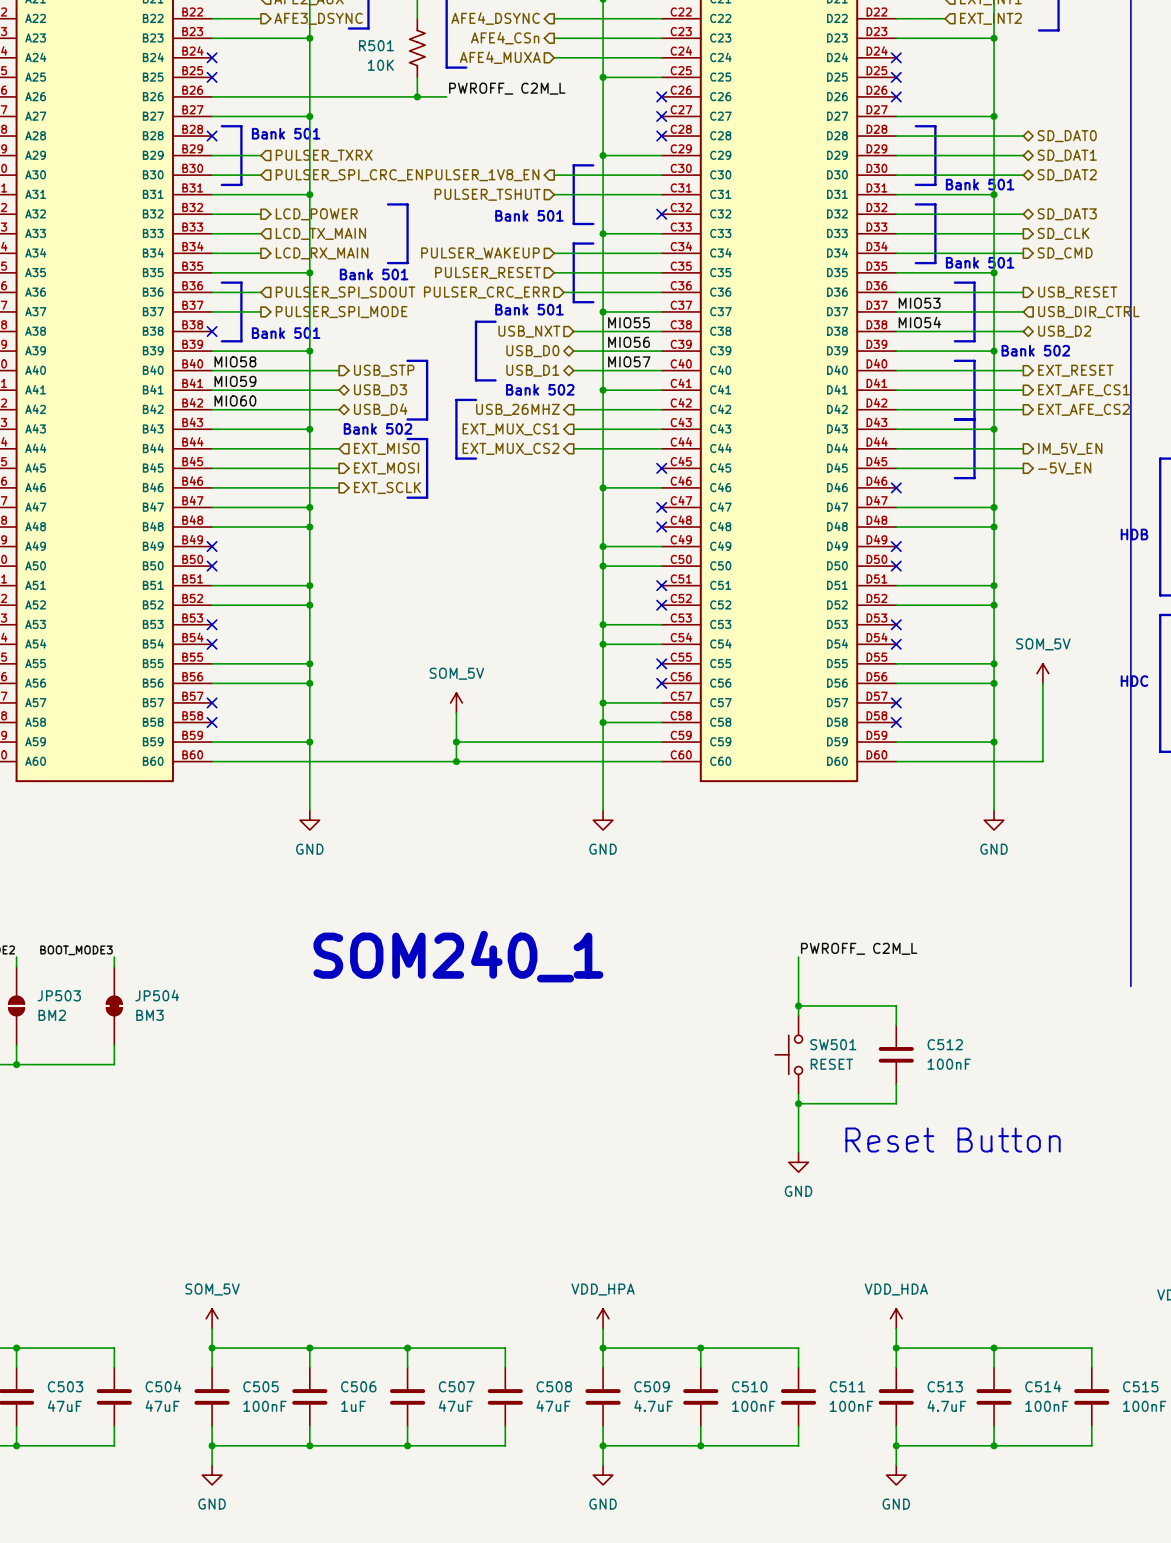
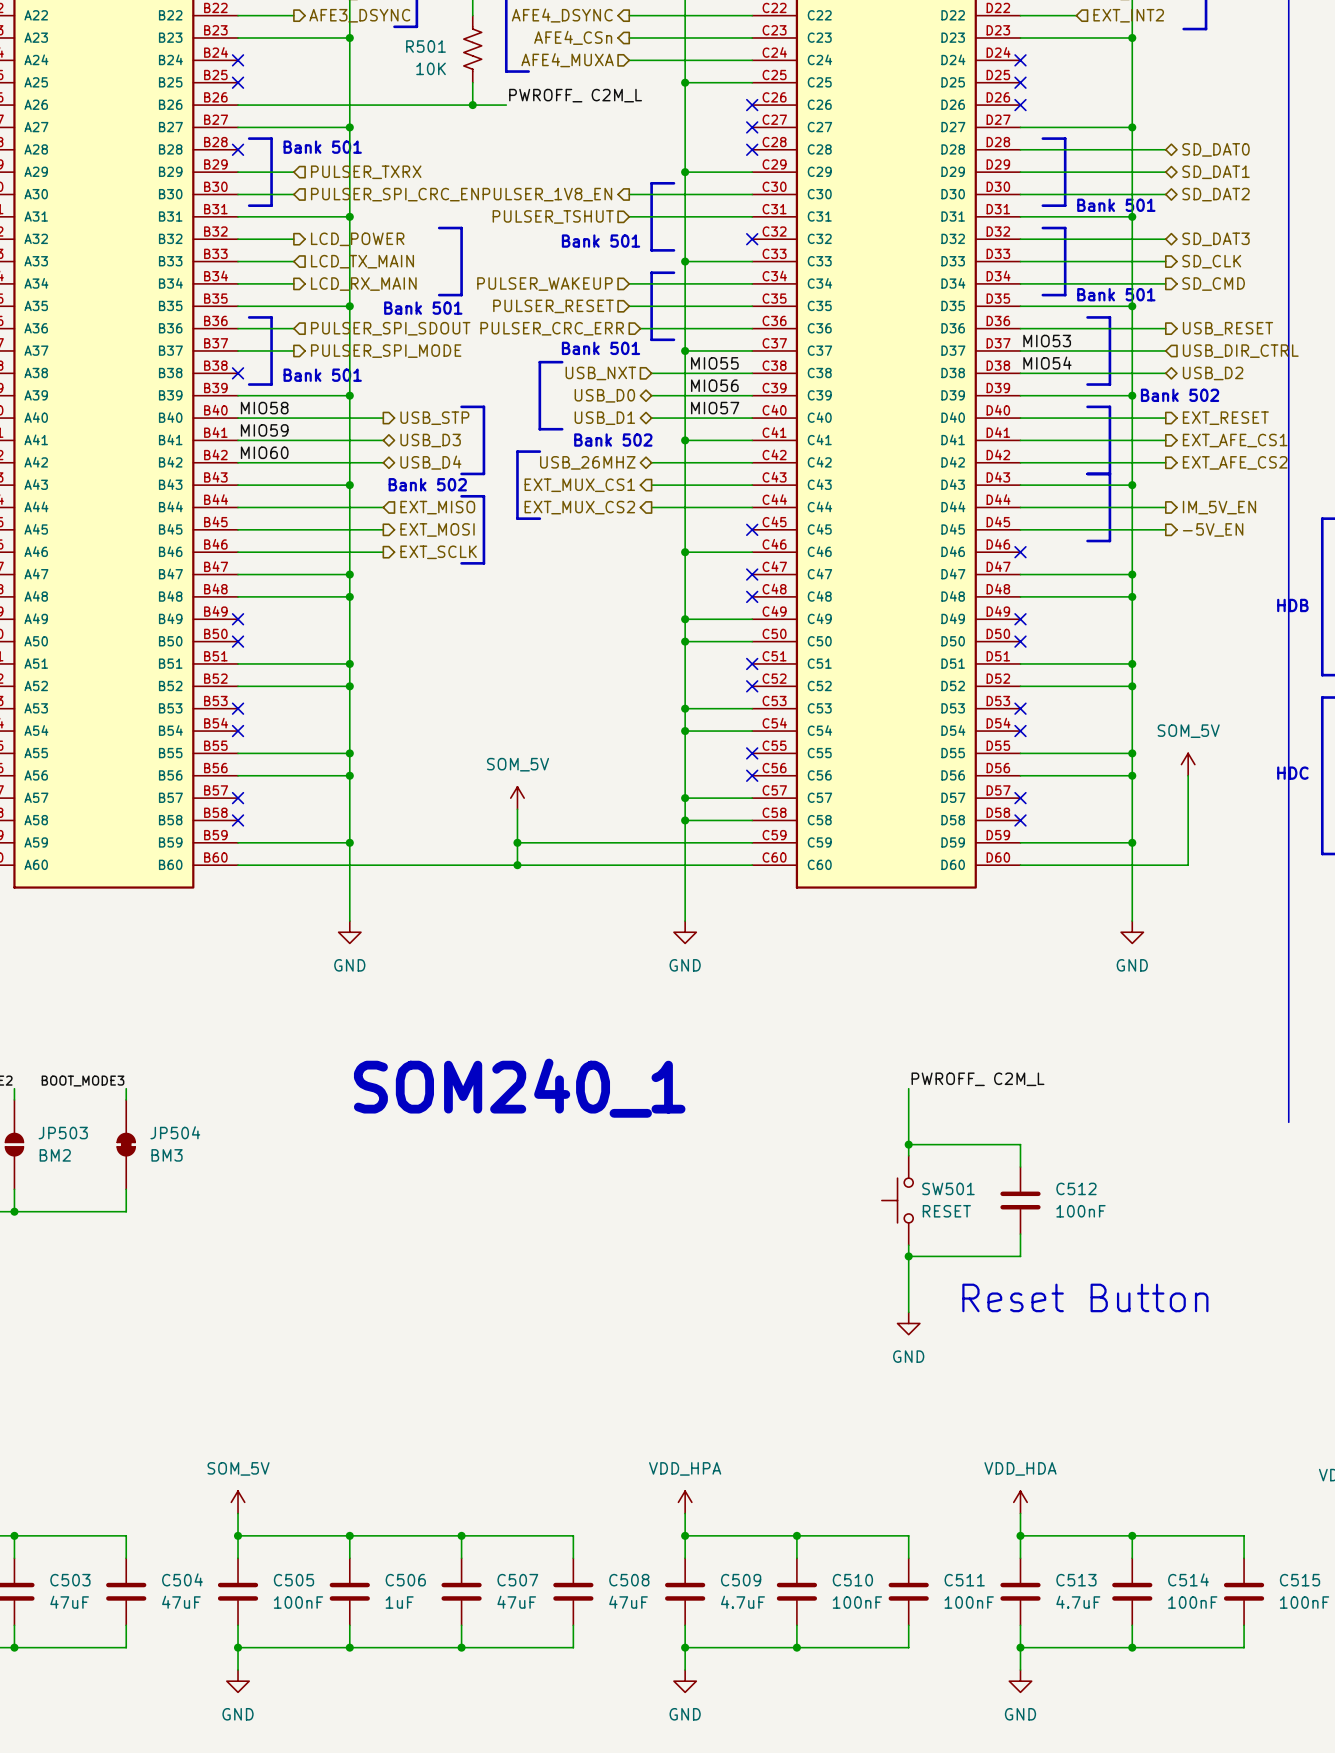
hierarchical label shape: output (517, 409) -> bidirectional (587, 462)

